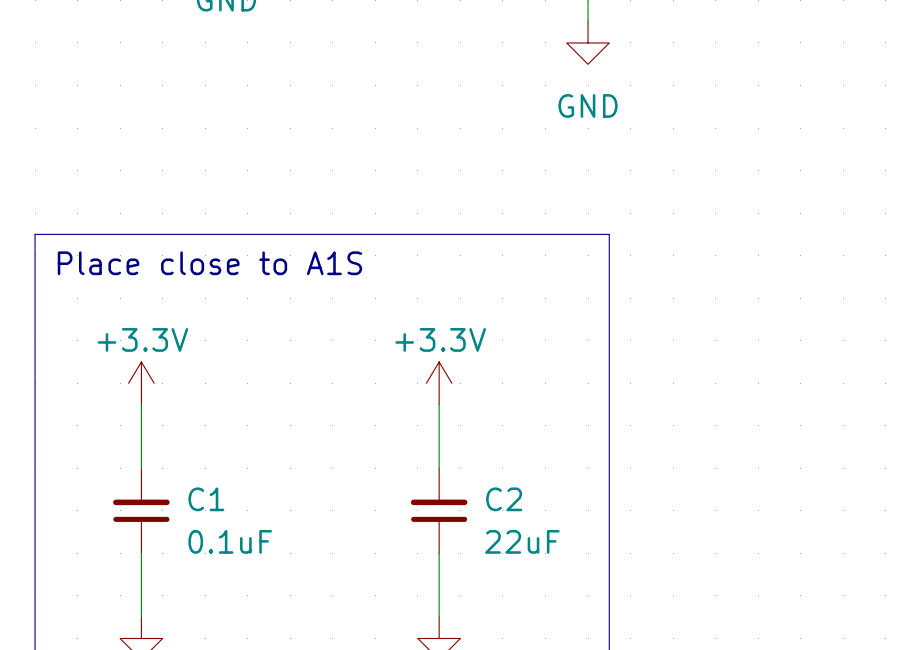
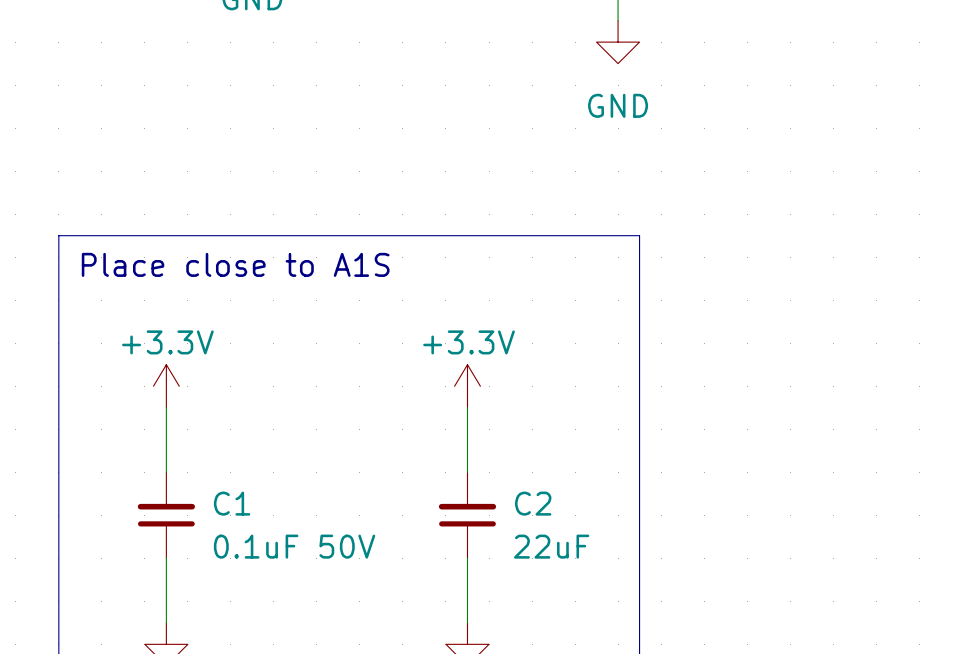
C1 value: 0.1uF (230, 541) -> 0.1uF 50V (294, 546)

